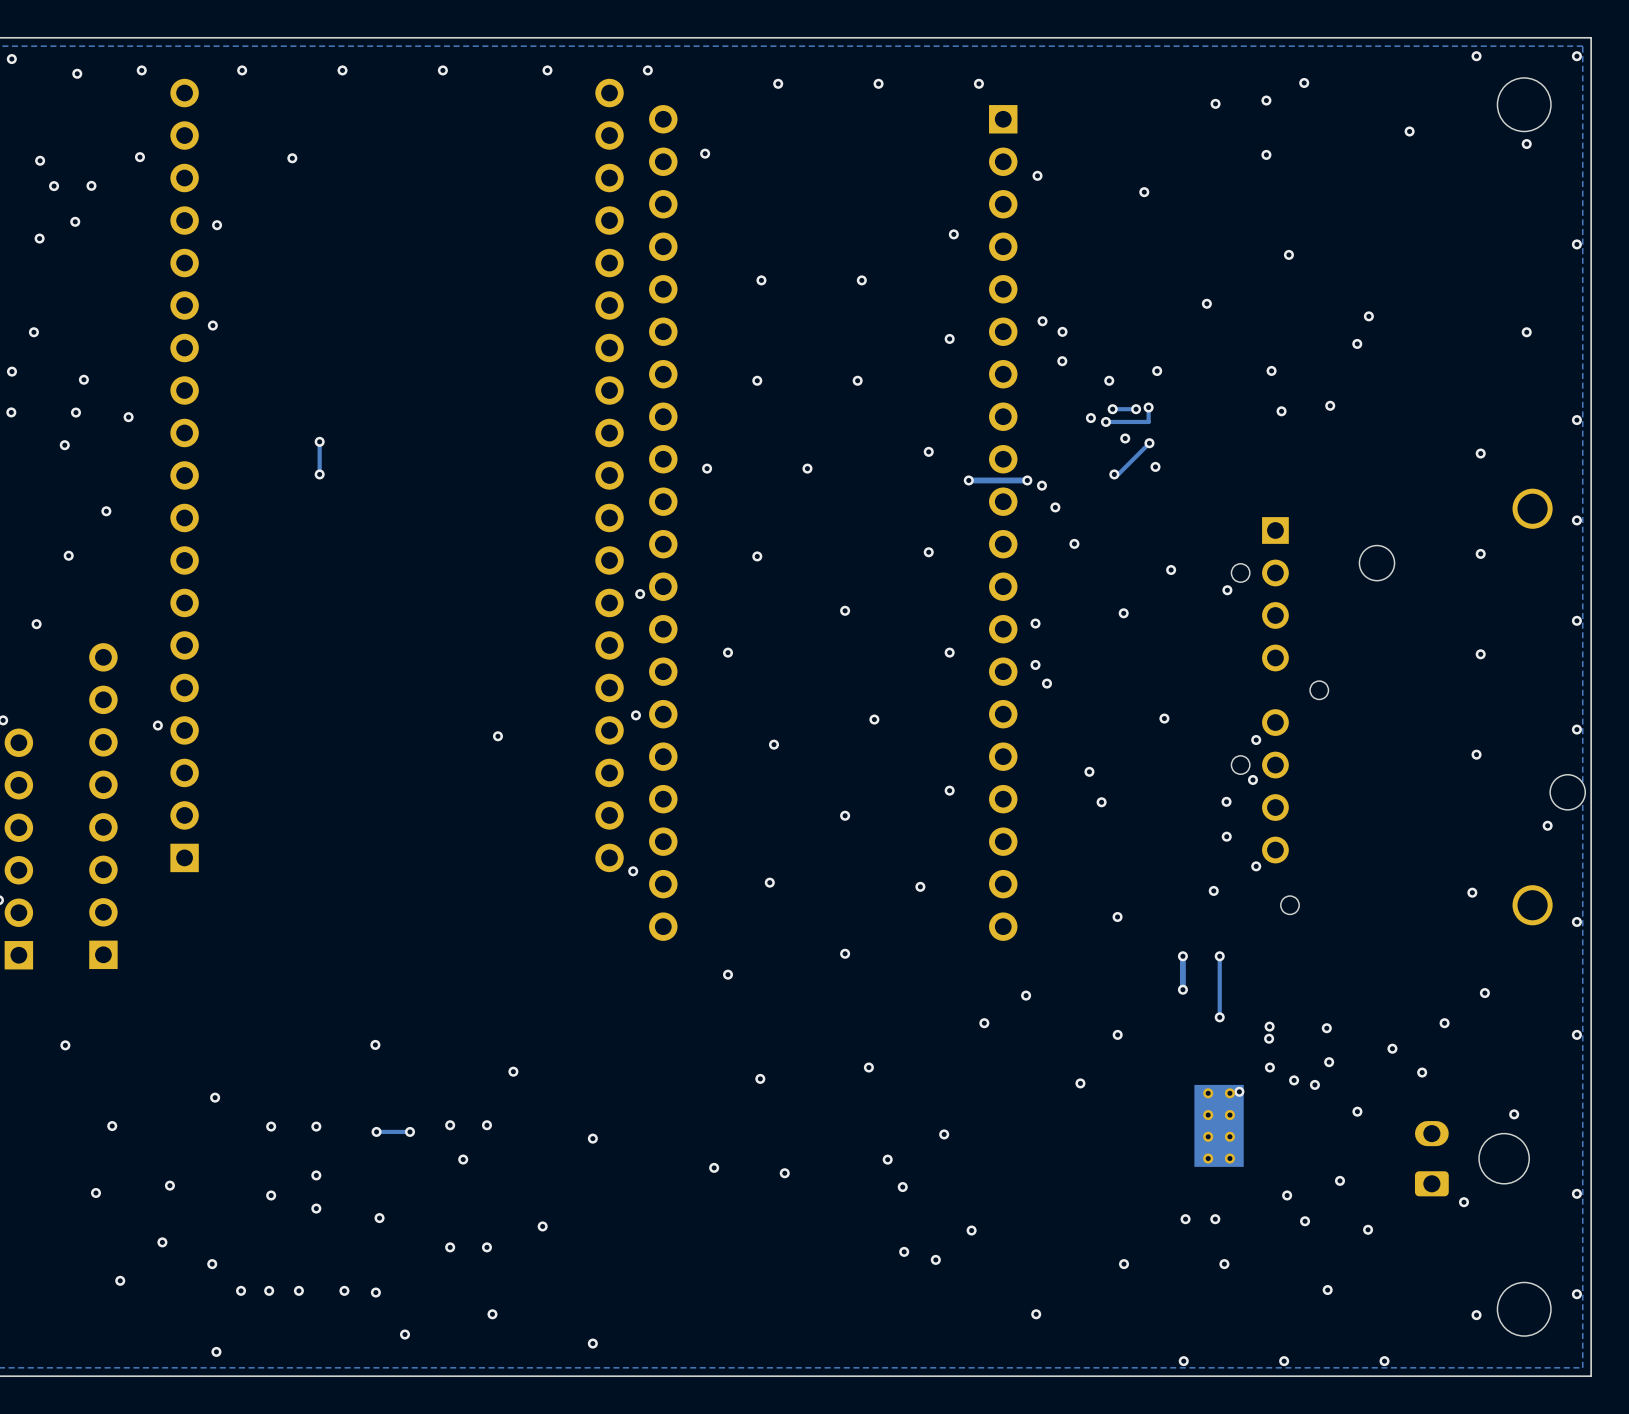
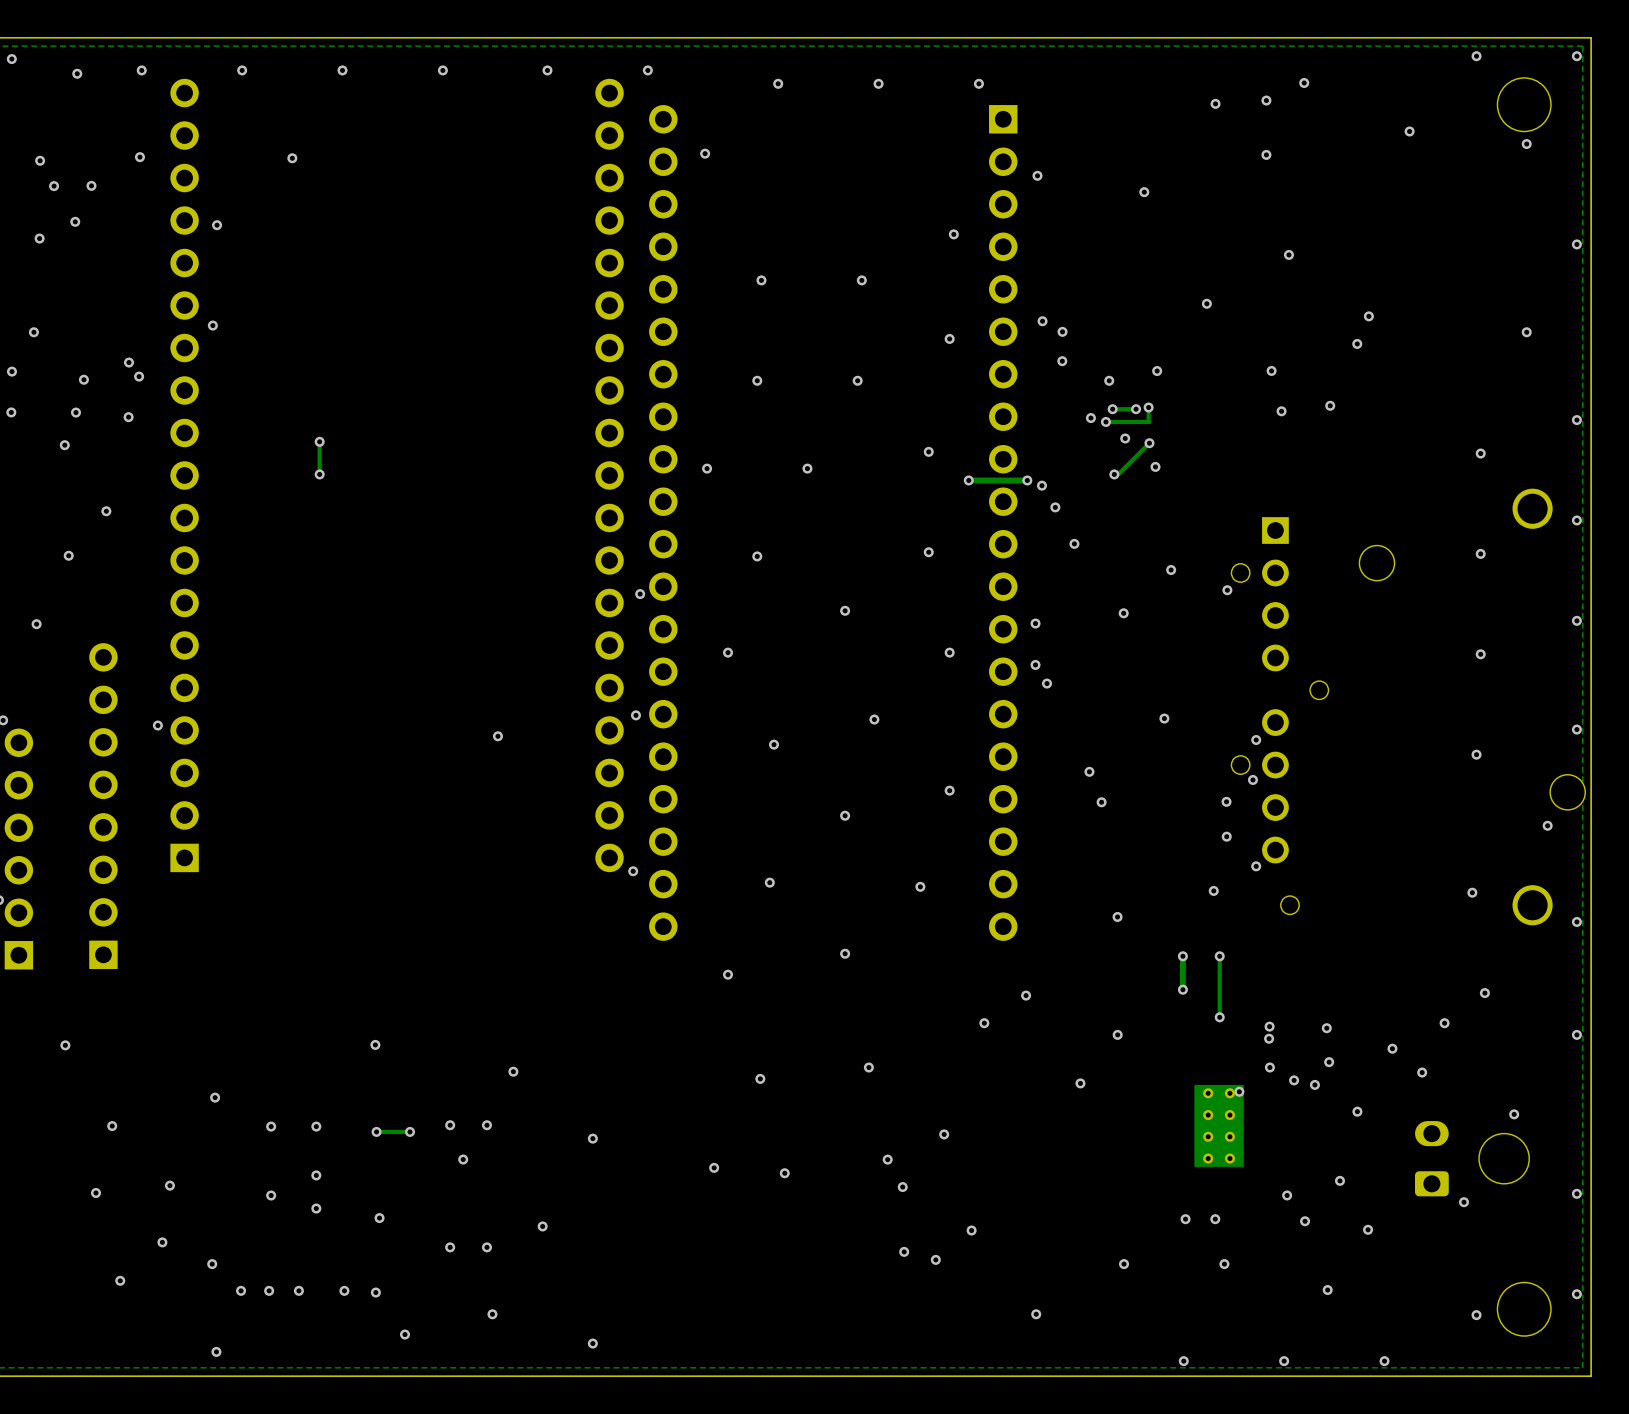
via: none -> (128, 362)
via: none -> (139, 376)

